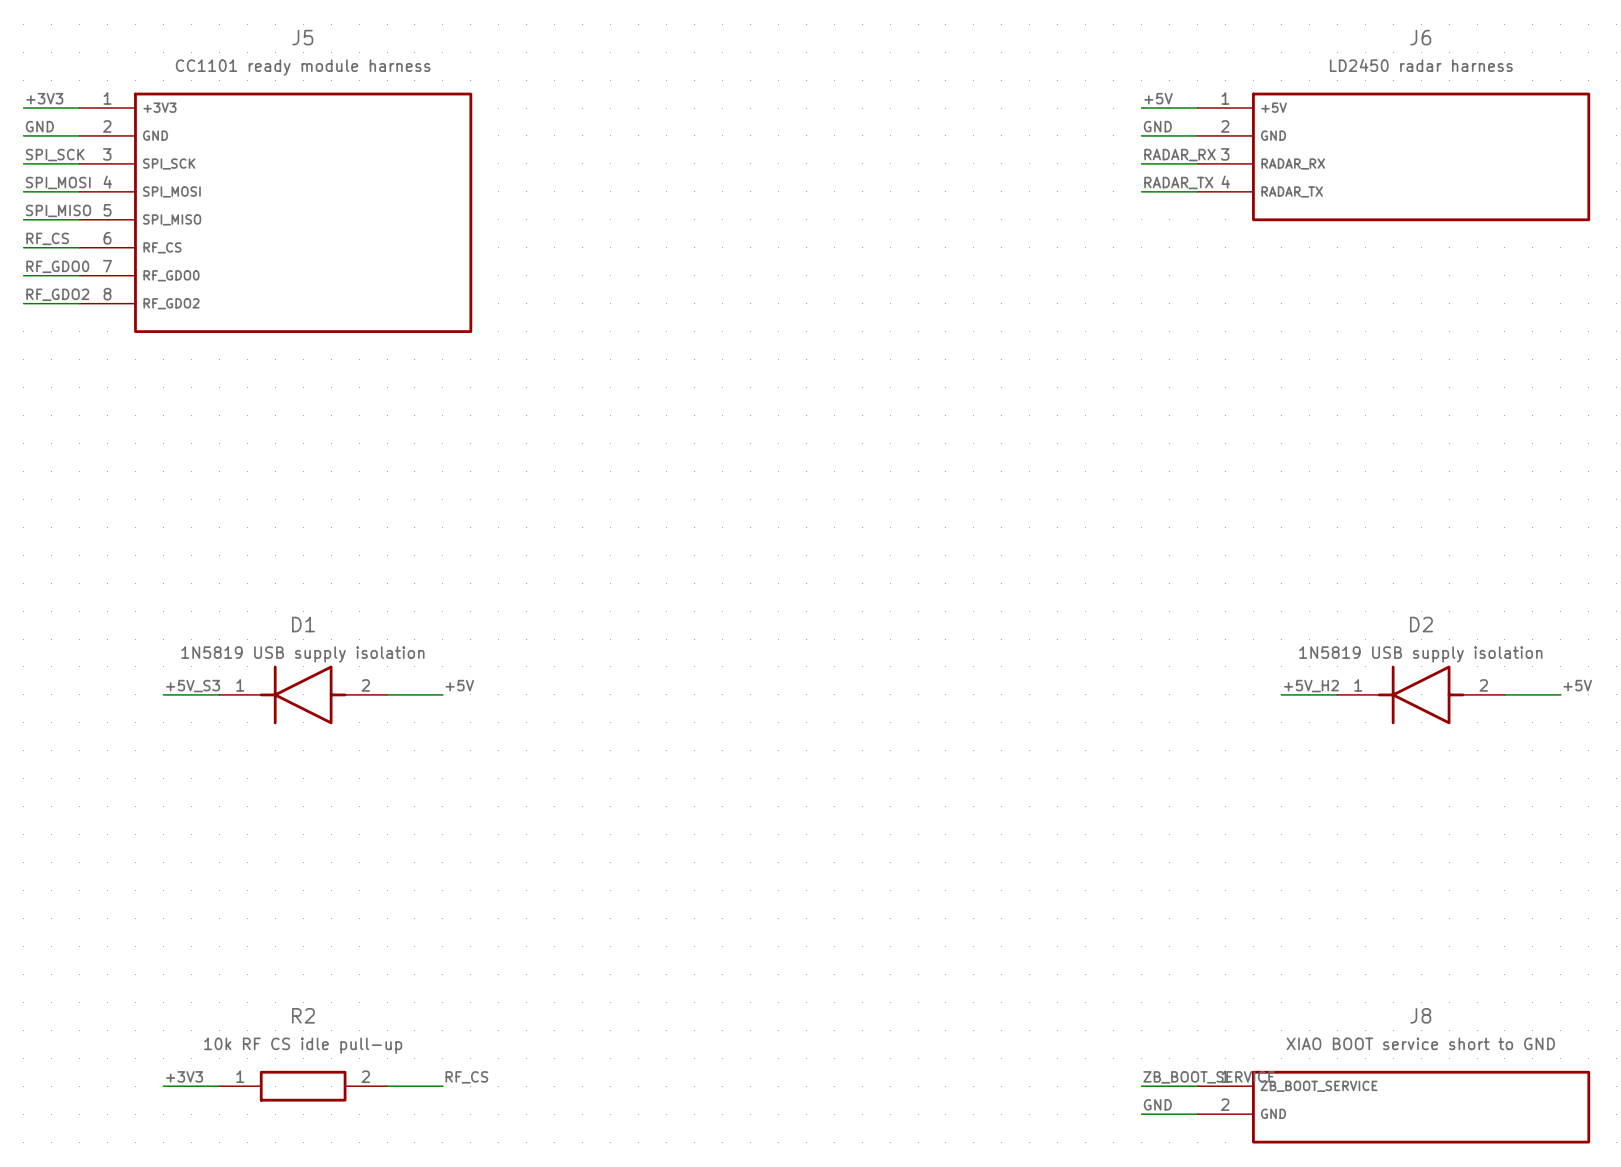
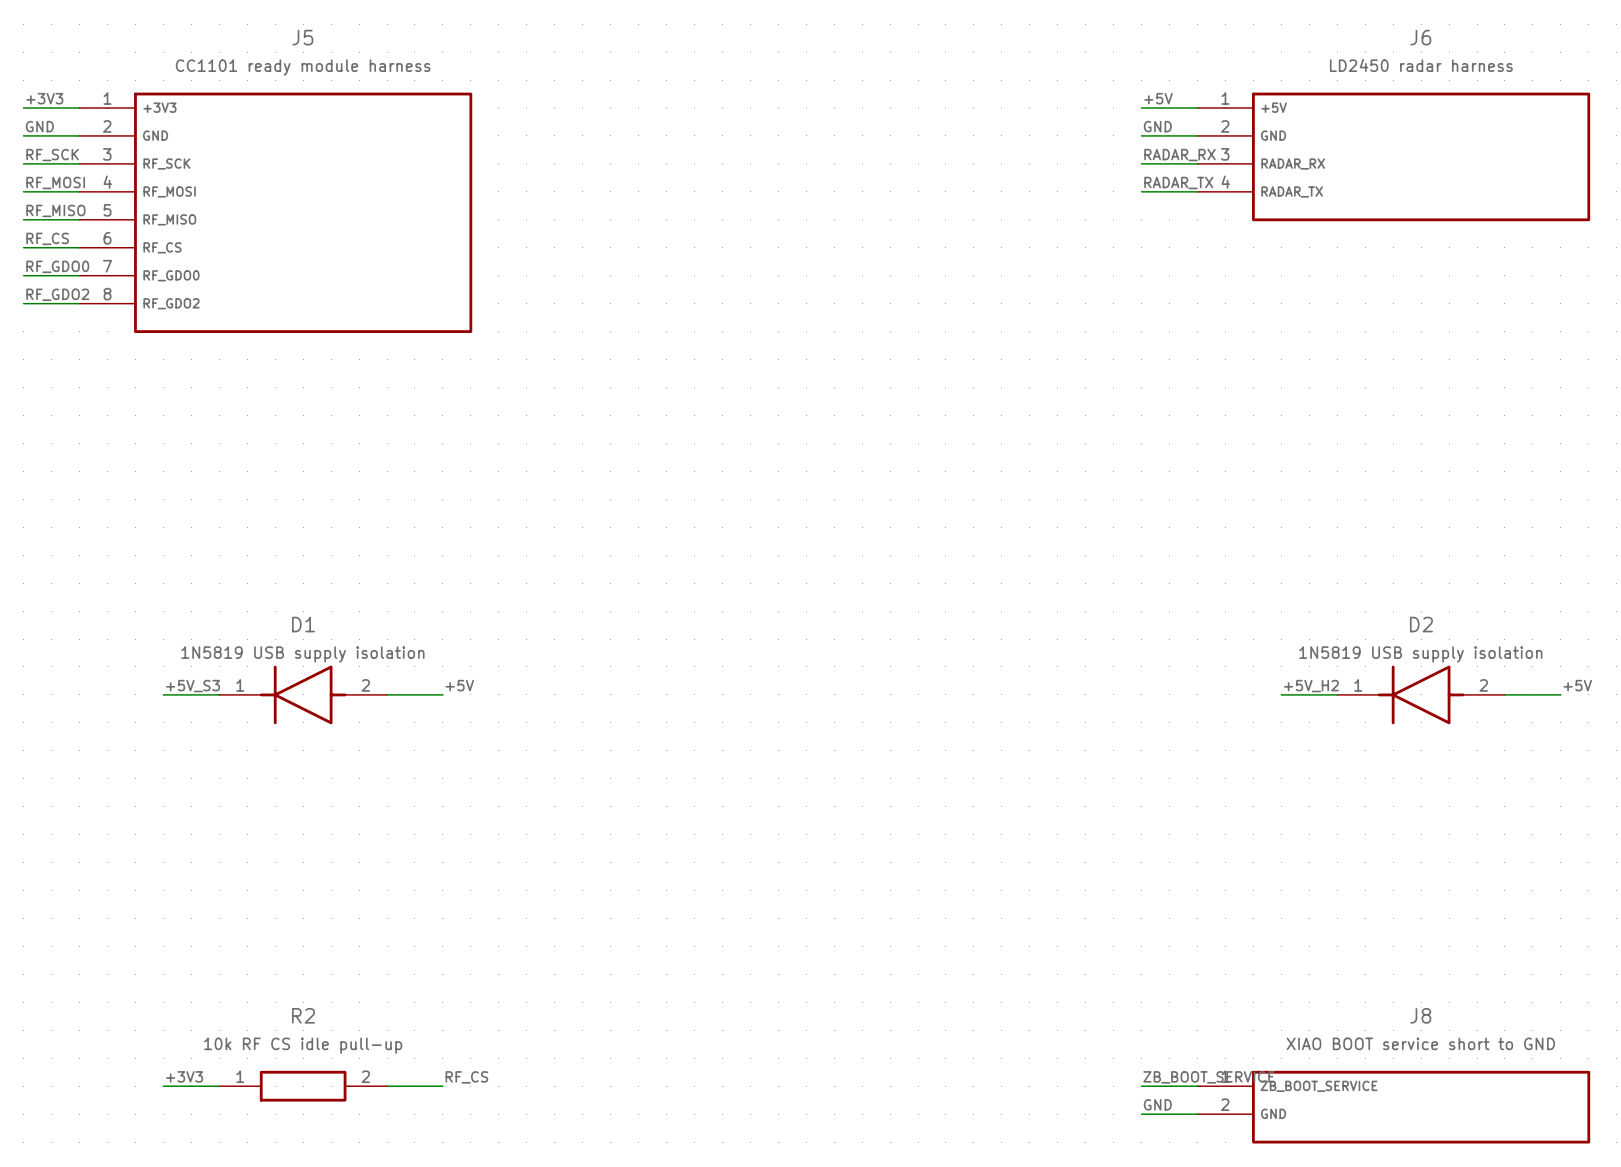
label: SPI_SCK (55, 155) -> RF_SCK (52, 155)
J5 pin name: SPI_SCK (169, 163) -> RF_SCK (166, 163)
label: SPI_MOSI (58, 183) -> RF_MOSI (55, 183)
J5 pin name: SPI_MOSI (171, 191) -> RF_MOSI (169, 191)
label: SPI_MISO (58, 210) -> RF_MISO (55, 210)
J5 pin name: SPI_MISO (172, 219) -> RF_MISO (169, 219)

